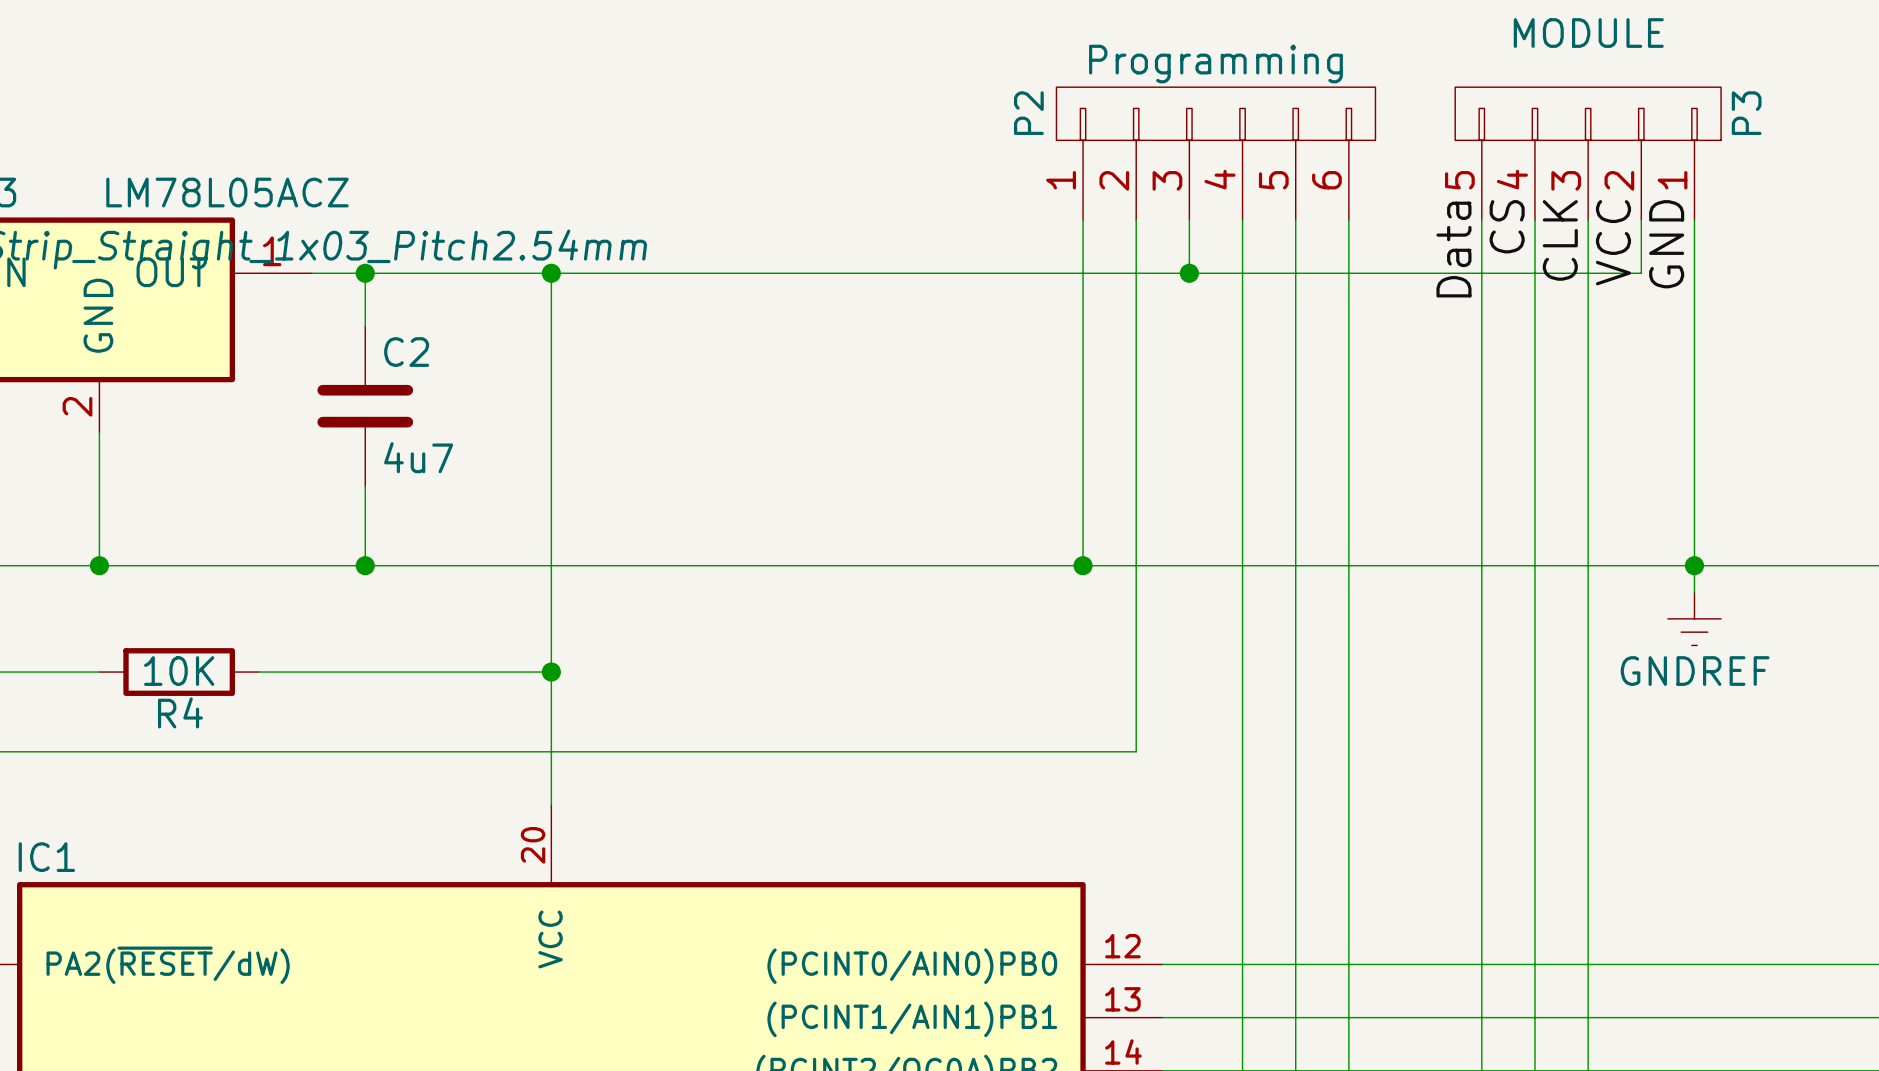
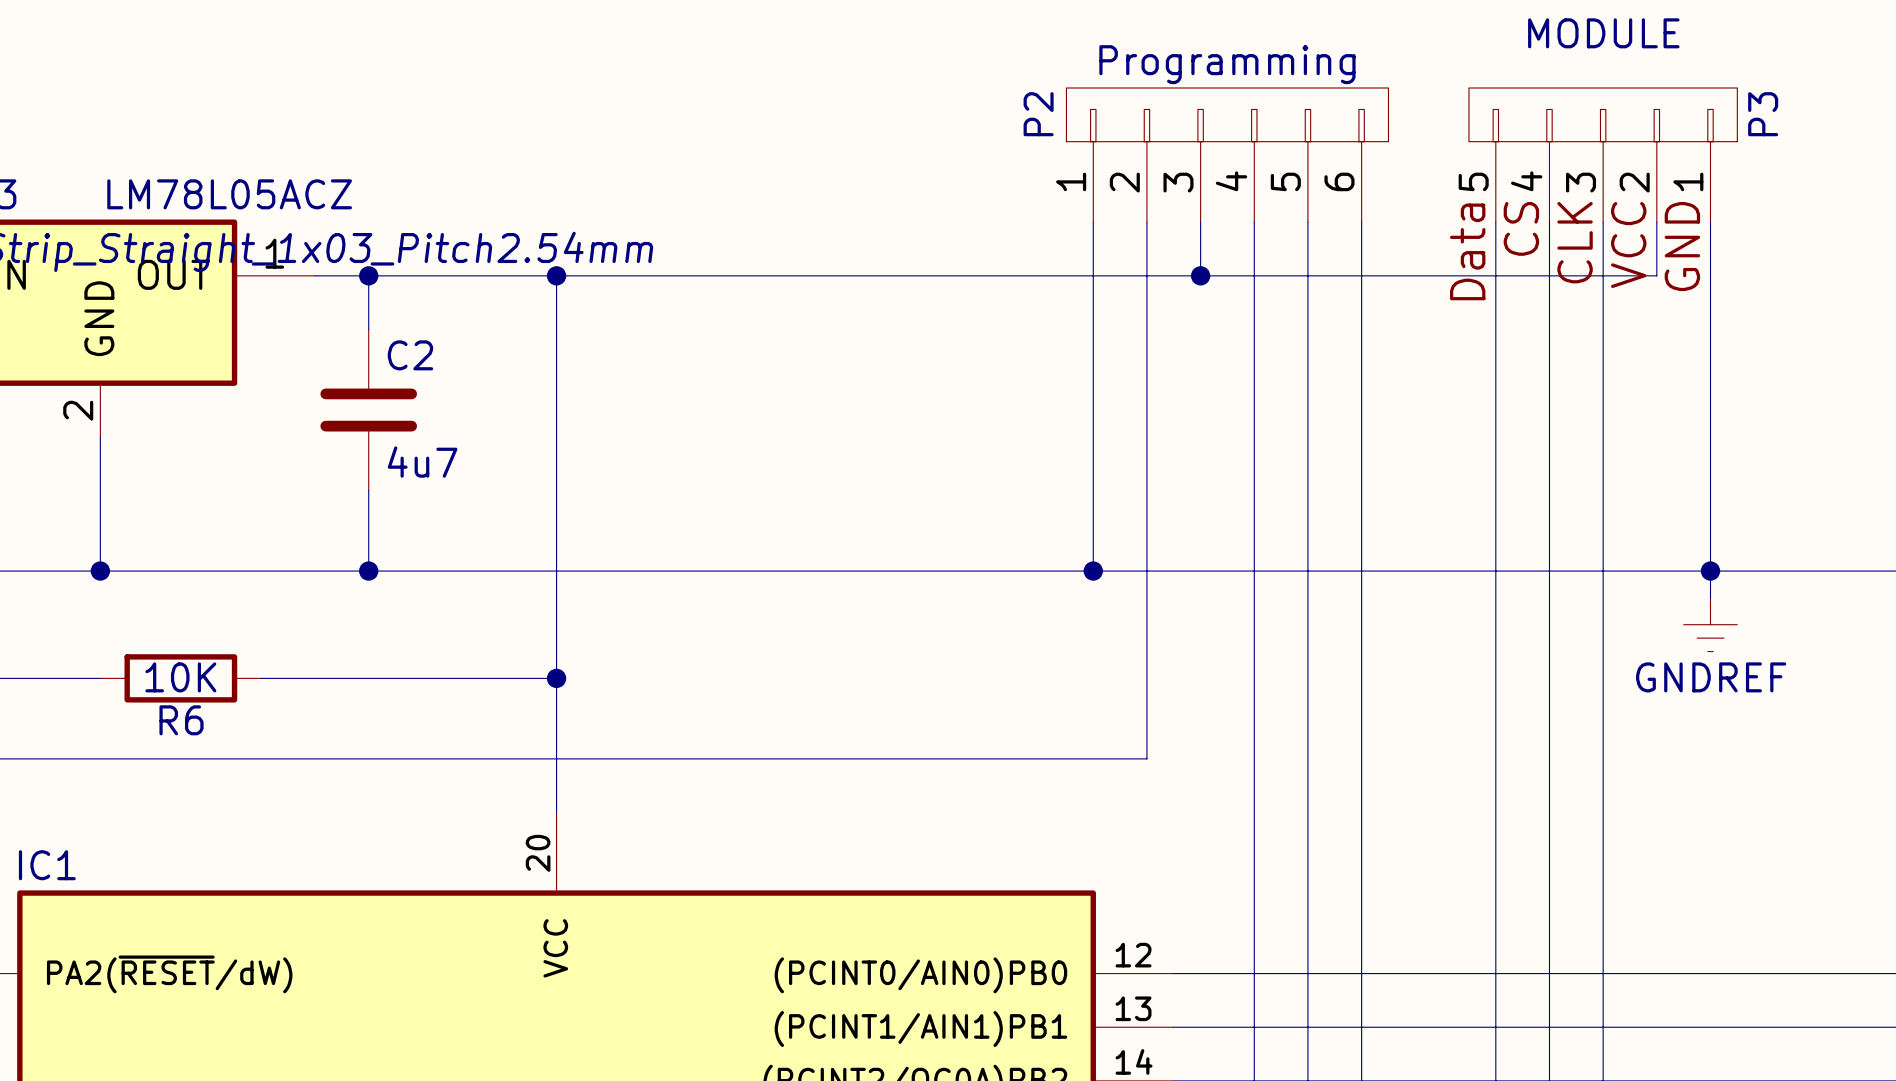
R4 name: R4 (180, 712) -> R6 (181, 720)

